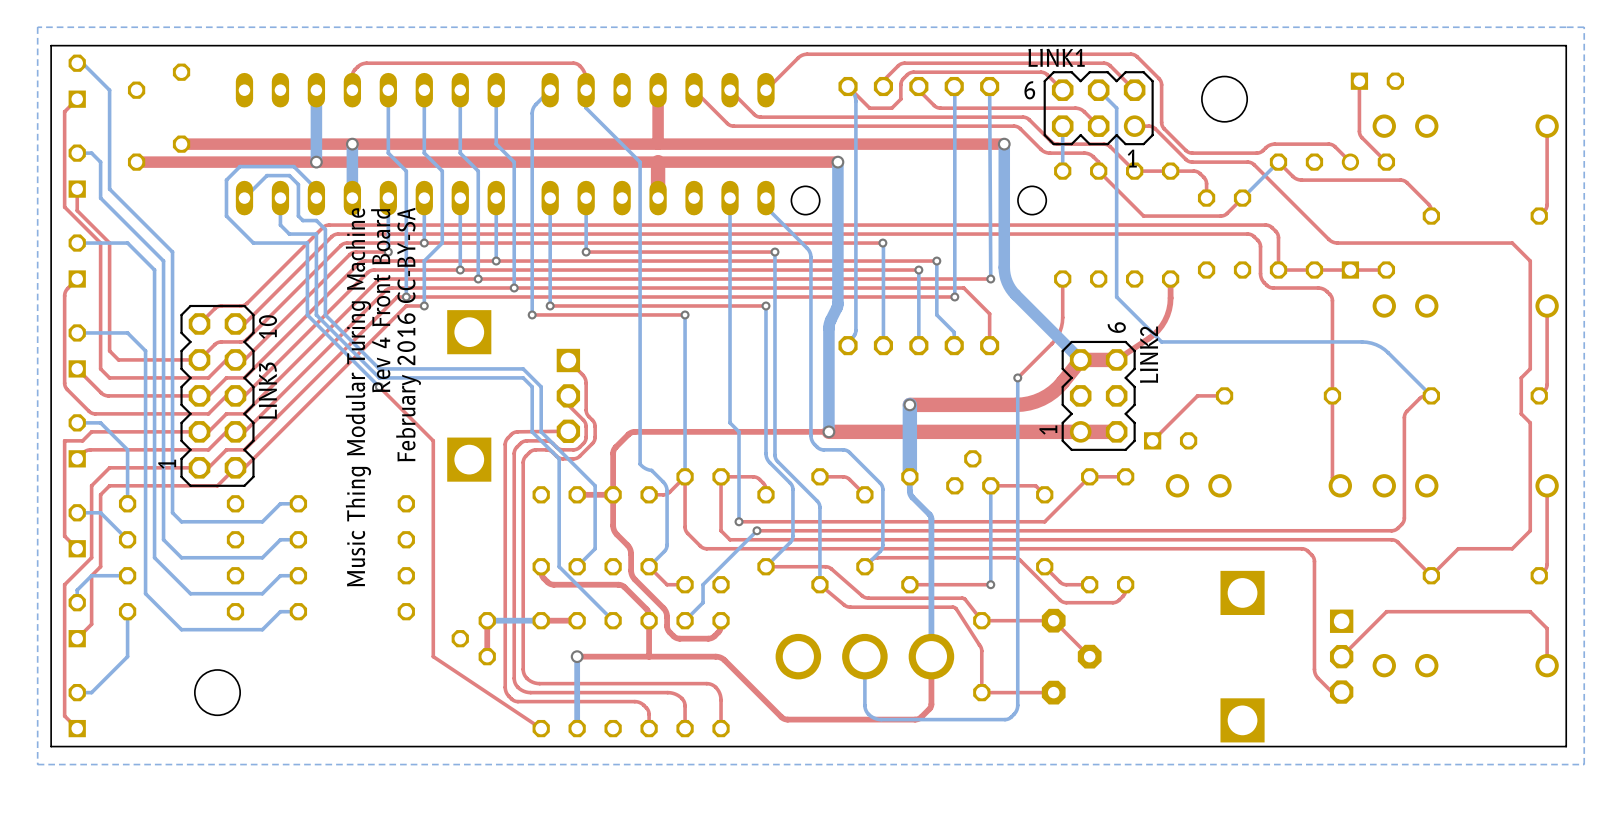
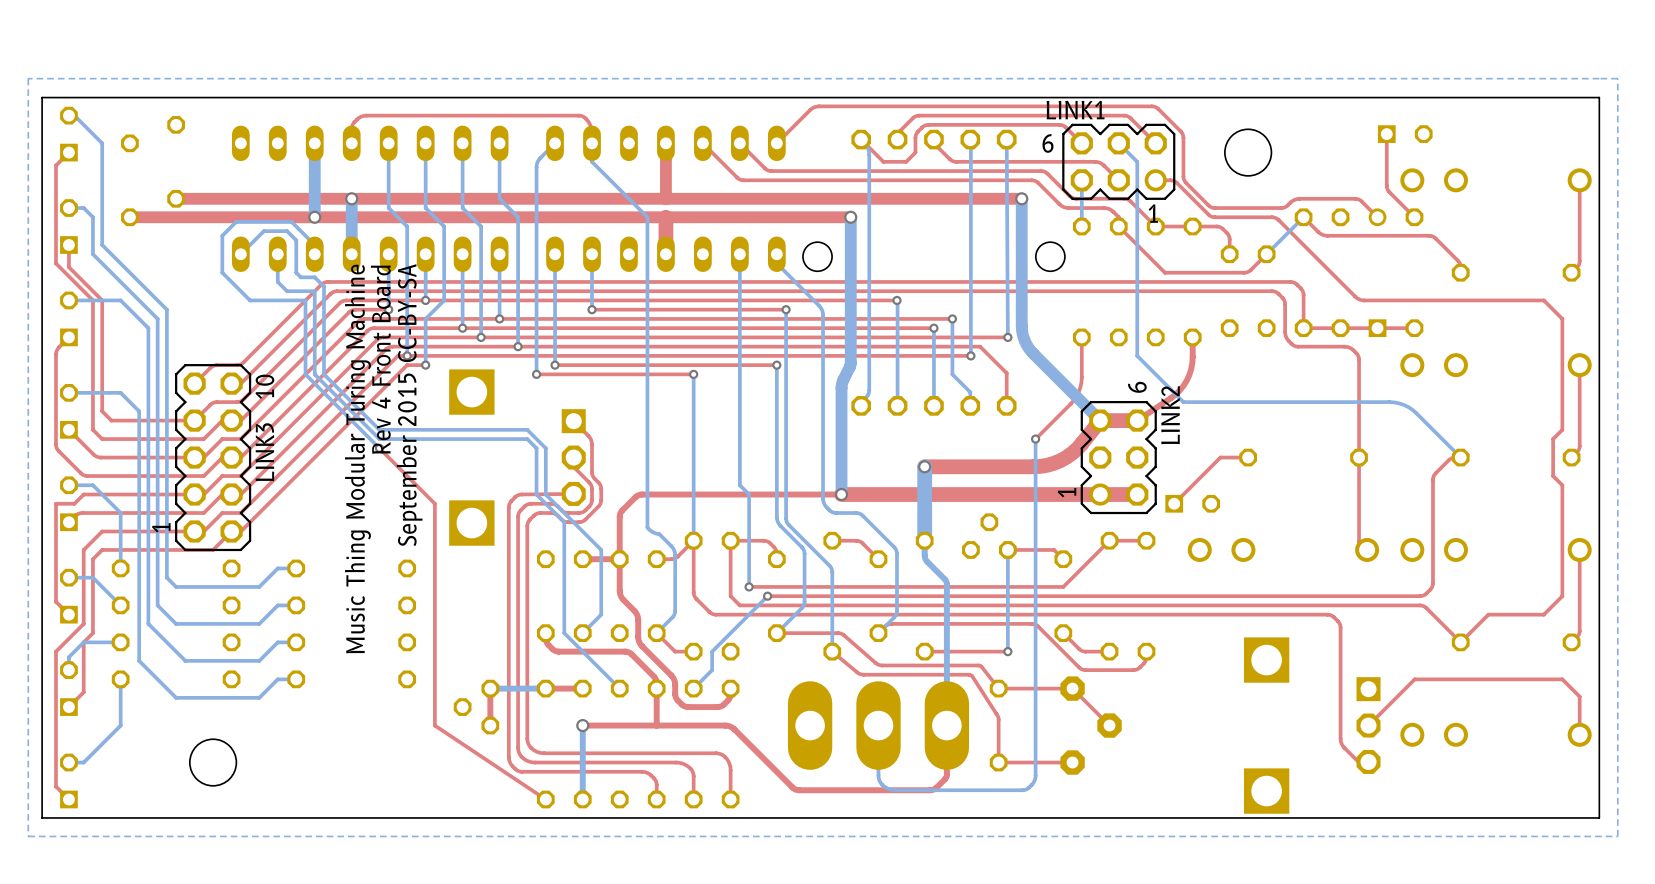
text: February 2016 CC-BY-SA (408, 334) -> September 2015 CC-BY-SA (409, 405)
part footprint: [775, 633, 955, 680] -> [787, 681, 970, 770]

